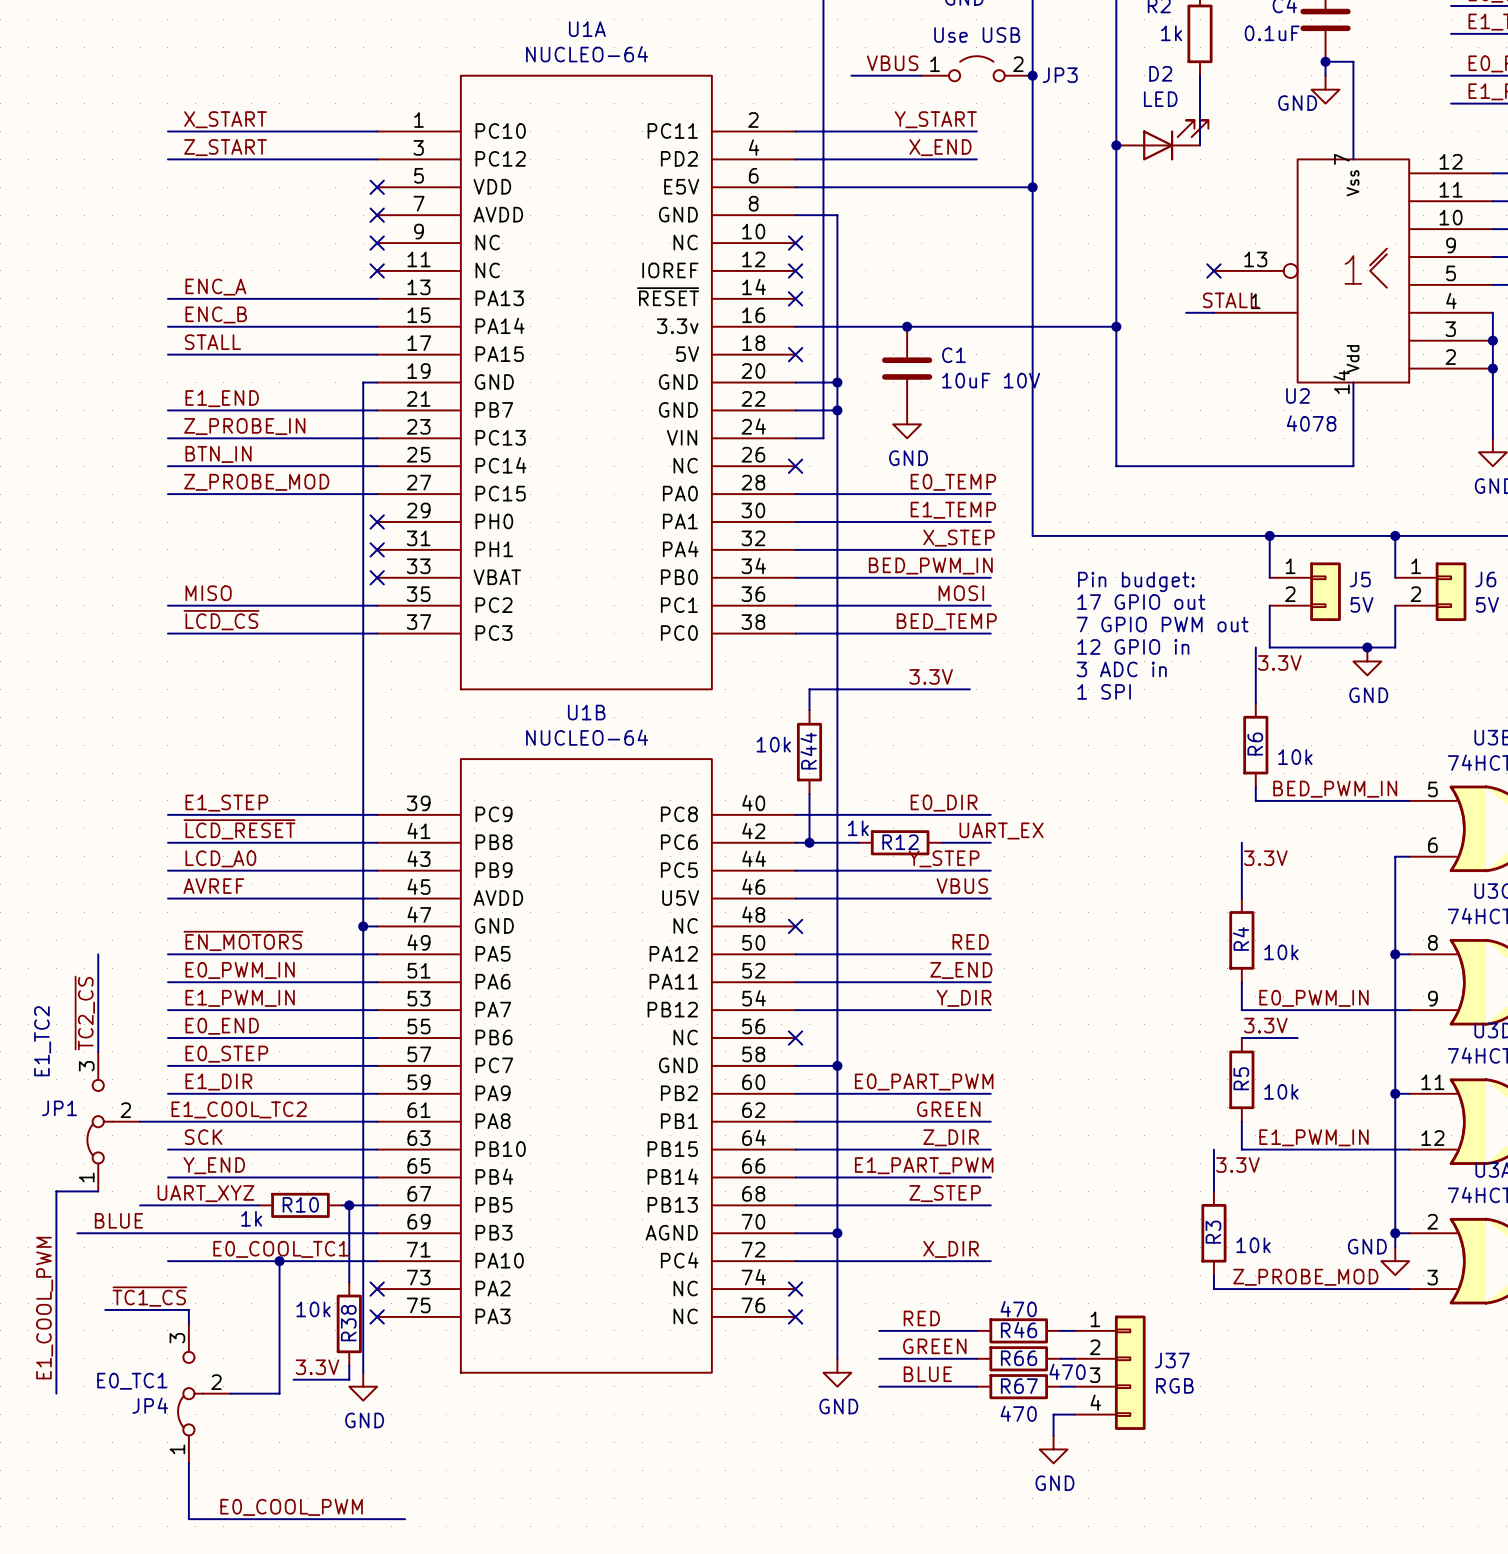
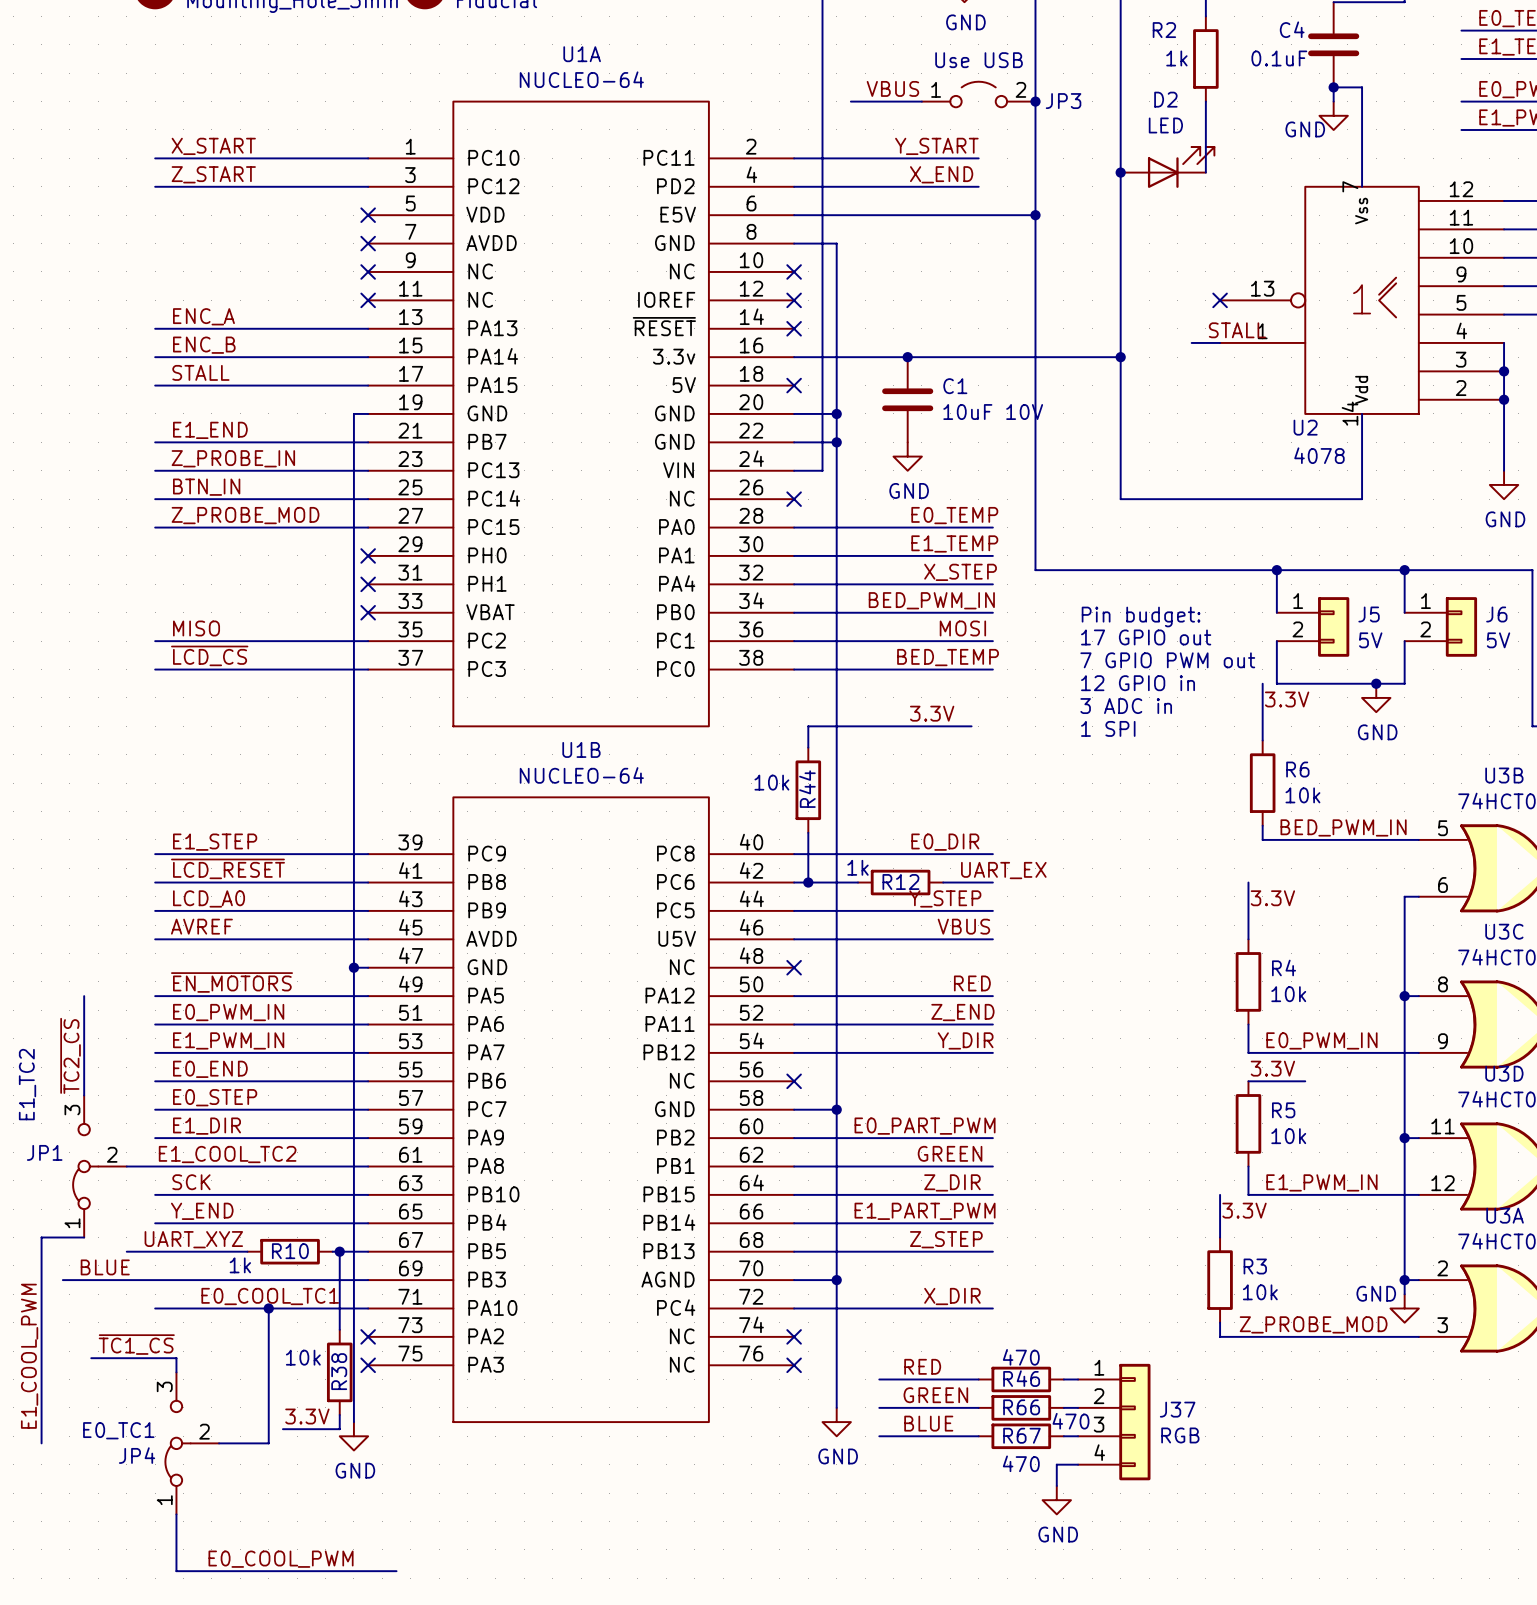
R6 name rotation: 0° (1255, 744) -> 90° clockwise (1297, 769)
R6 name position: R6 (1255, 744) -> R6 (1297, 769)
R4 name rotation: 0° (1241, 938) -> 90° clockwise (1284, 967)
R4 name position: R4 (1241, 938) -> R4 (1284, 967)
R5 name rotation: 0° (1241, 1078) -> 90° clockwise (1283, 1110)
R5 name position: R5 (1241, 1078) -> R5 (1283, 1110)
R3 name rotation: 0° (1213, 1232) -> 90° clockwise (1255, 1266)
R3 name position: R3 (1213, 1232) -> R3 (1255, 1266)

